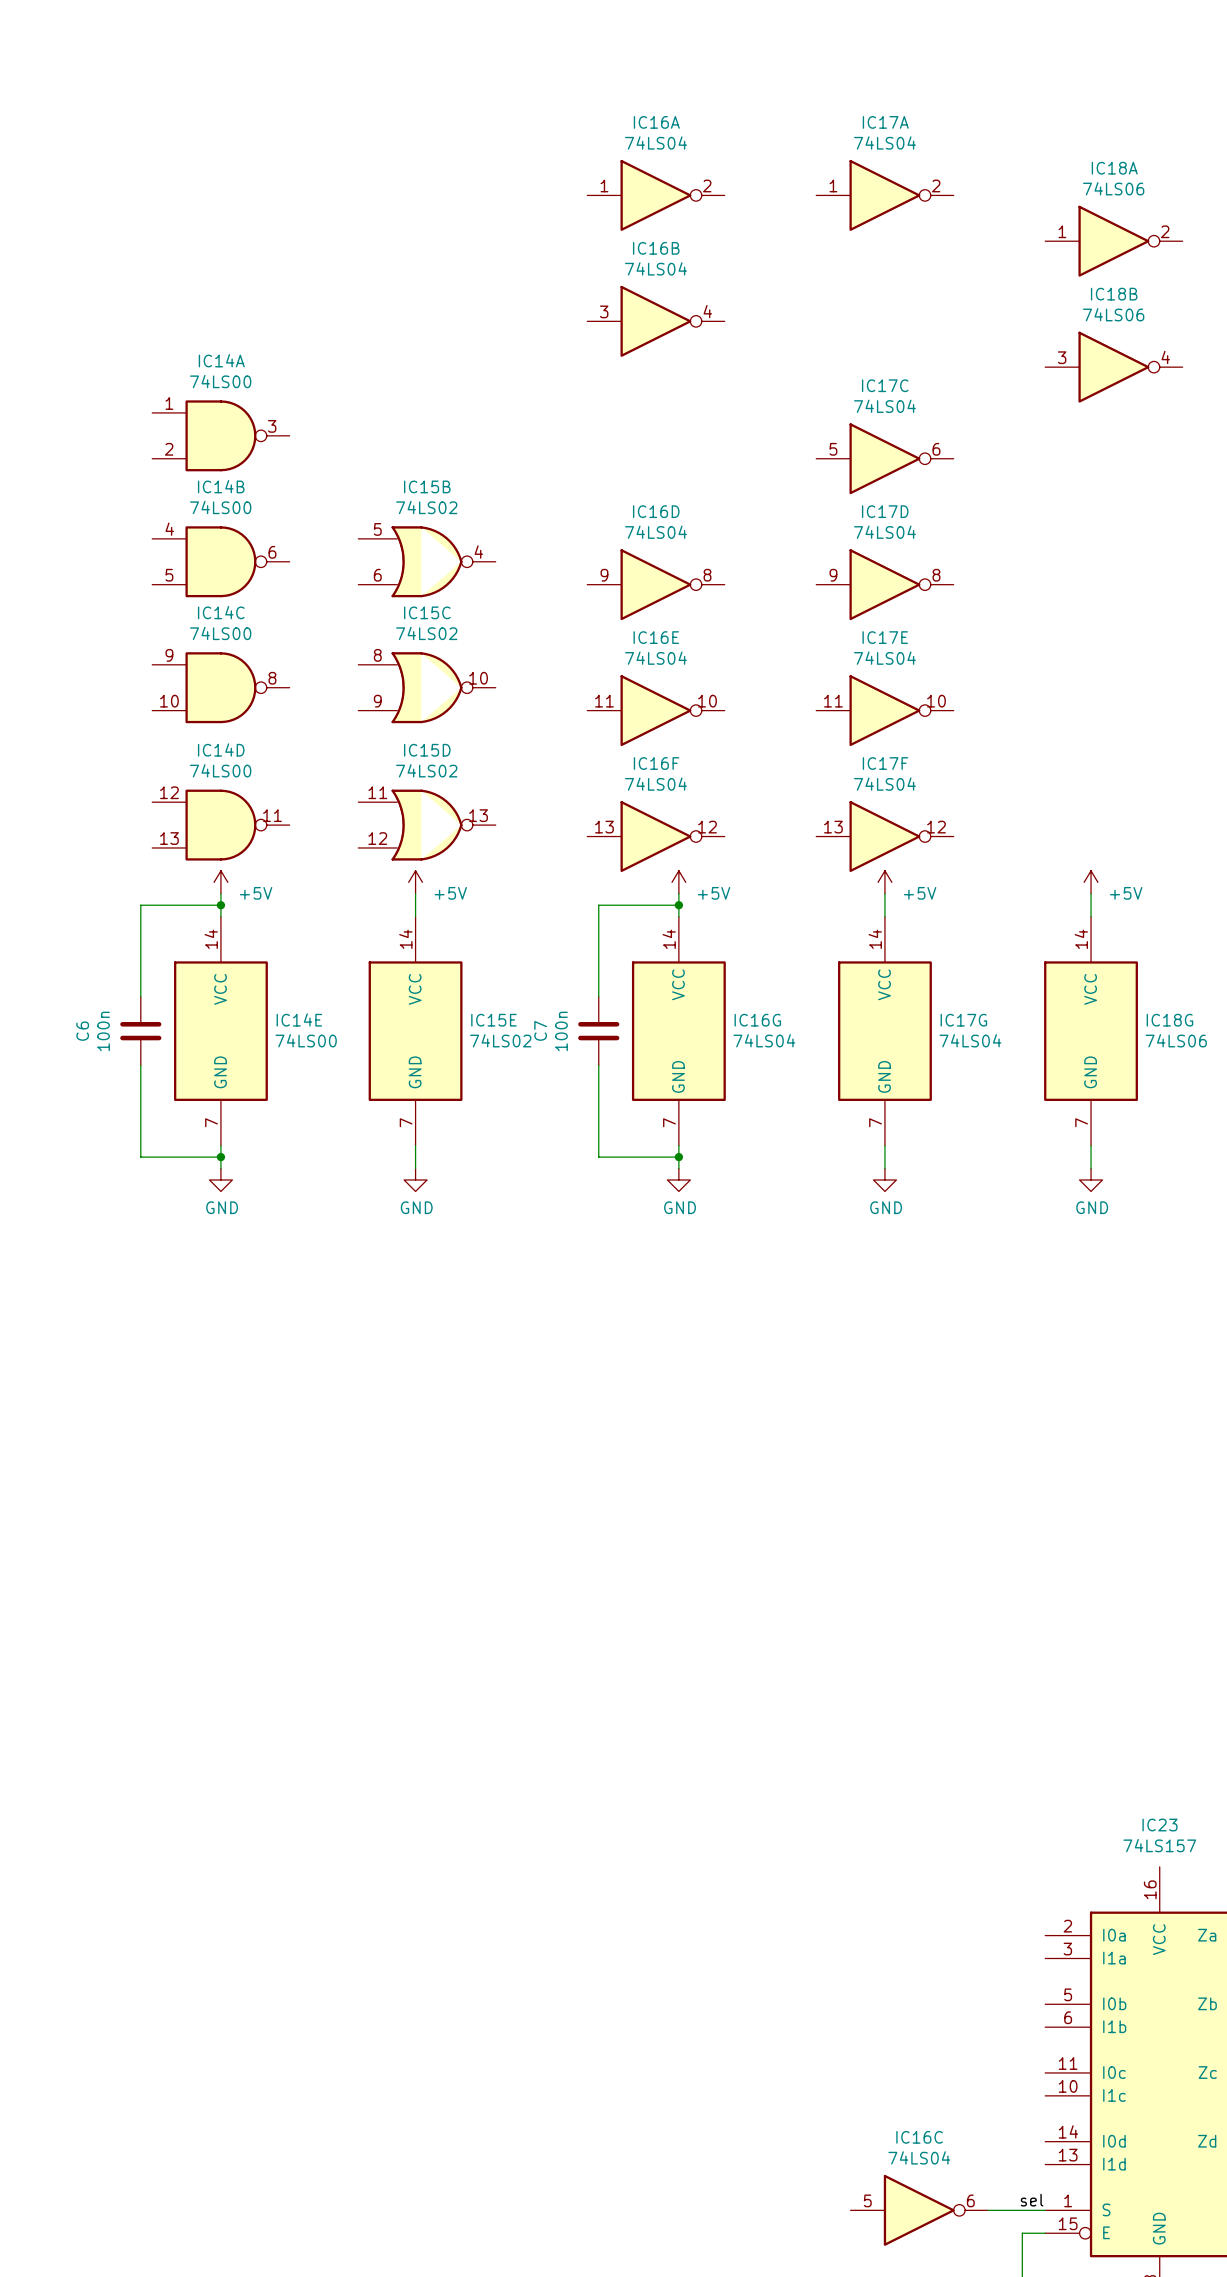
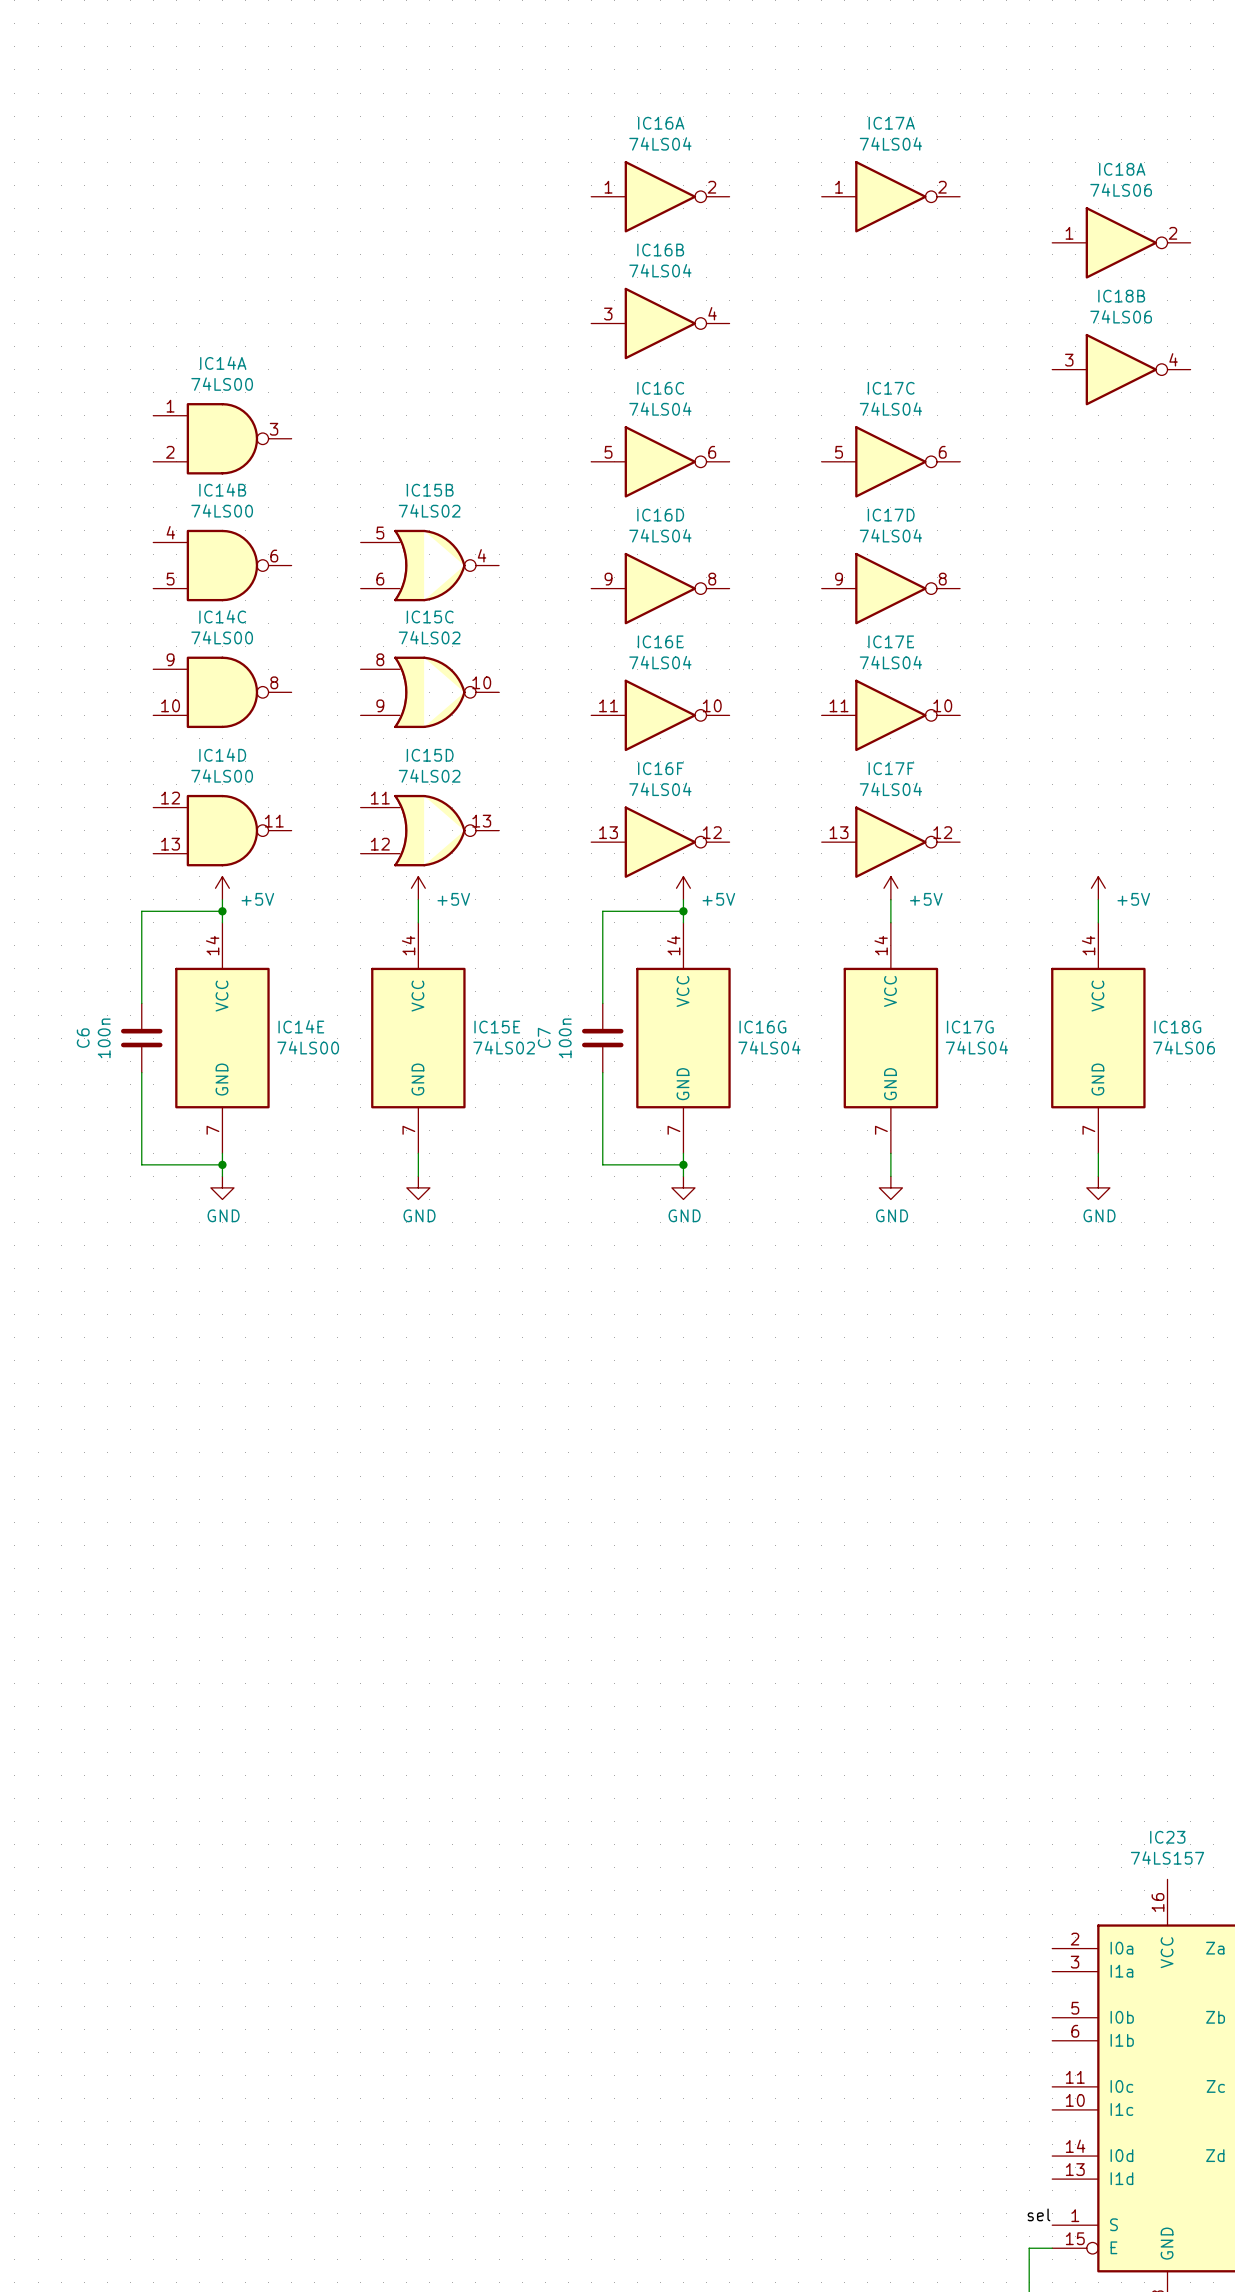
IC16C position: (919, 2210) -> (660, 461)
wire: (987, 2210) (1045, 2210) -> none

